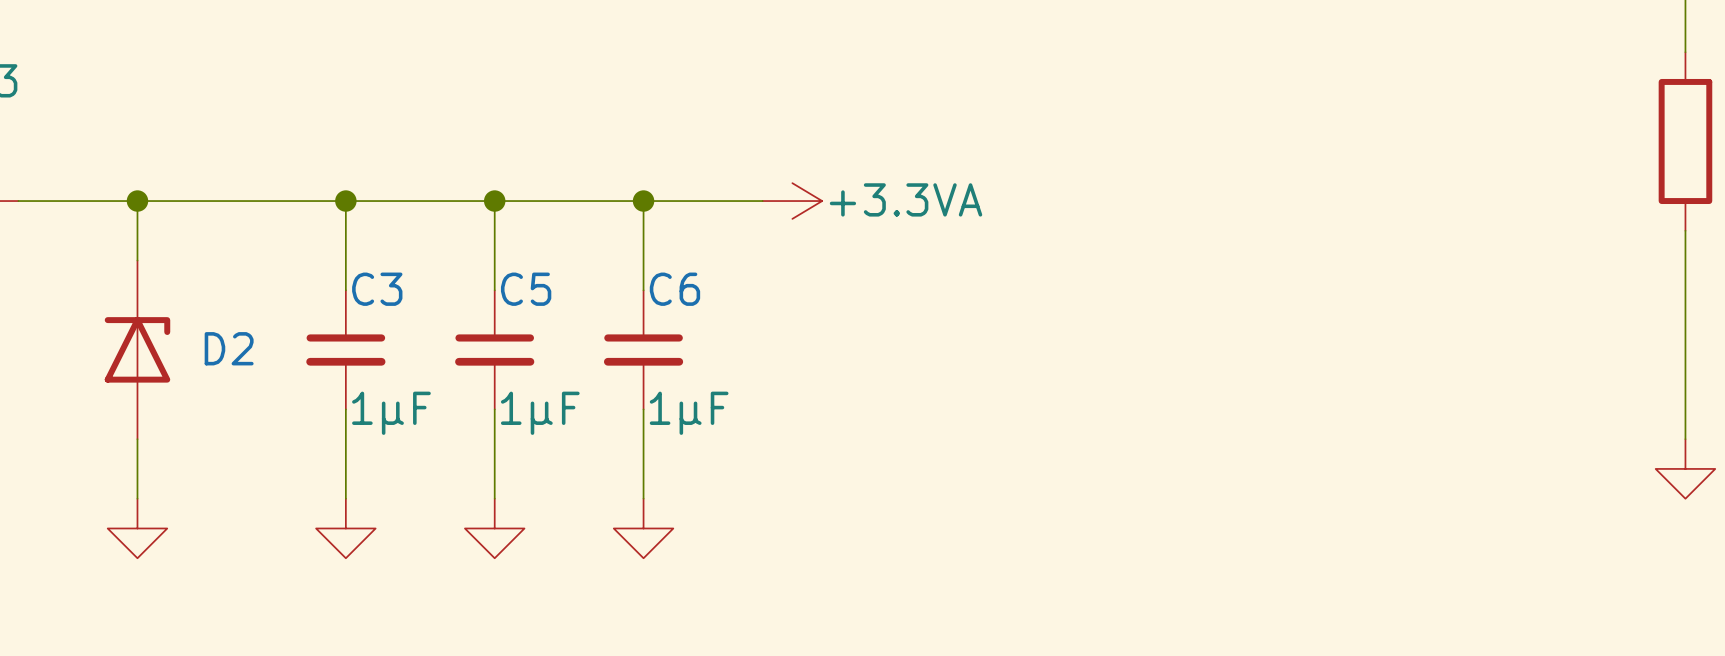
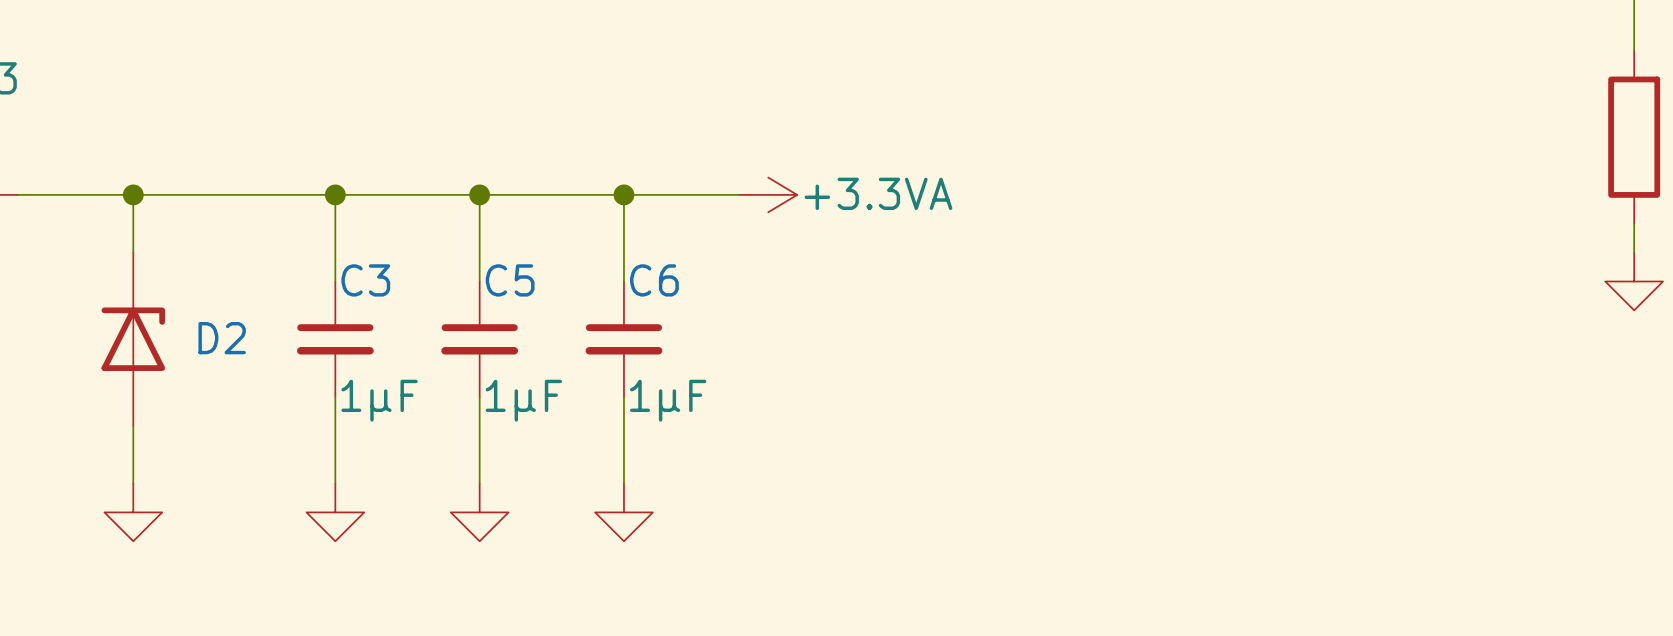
wire: (1685, 260) (1685, 439) -> none
power symbol: none -> (1634, 281)
power symbol: (1685, 468) -> none

